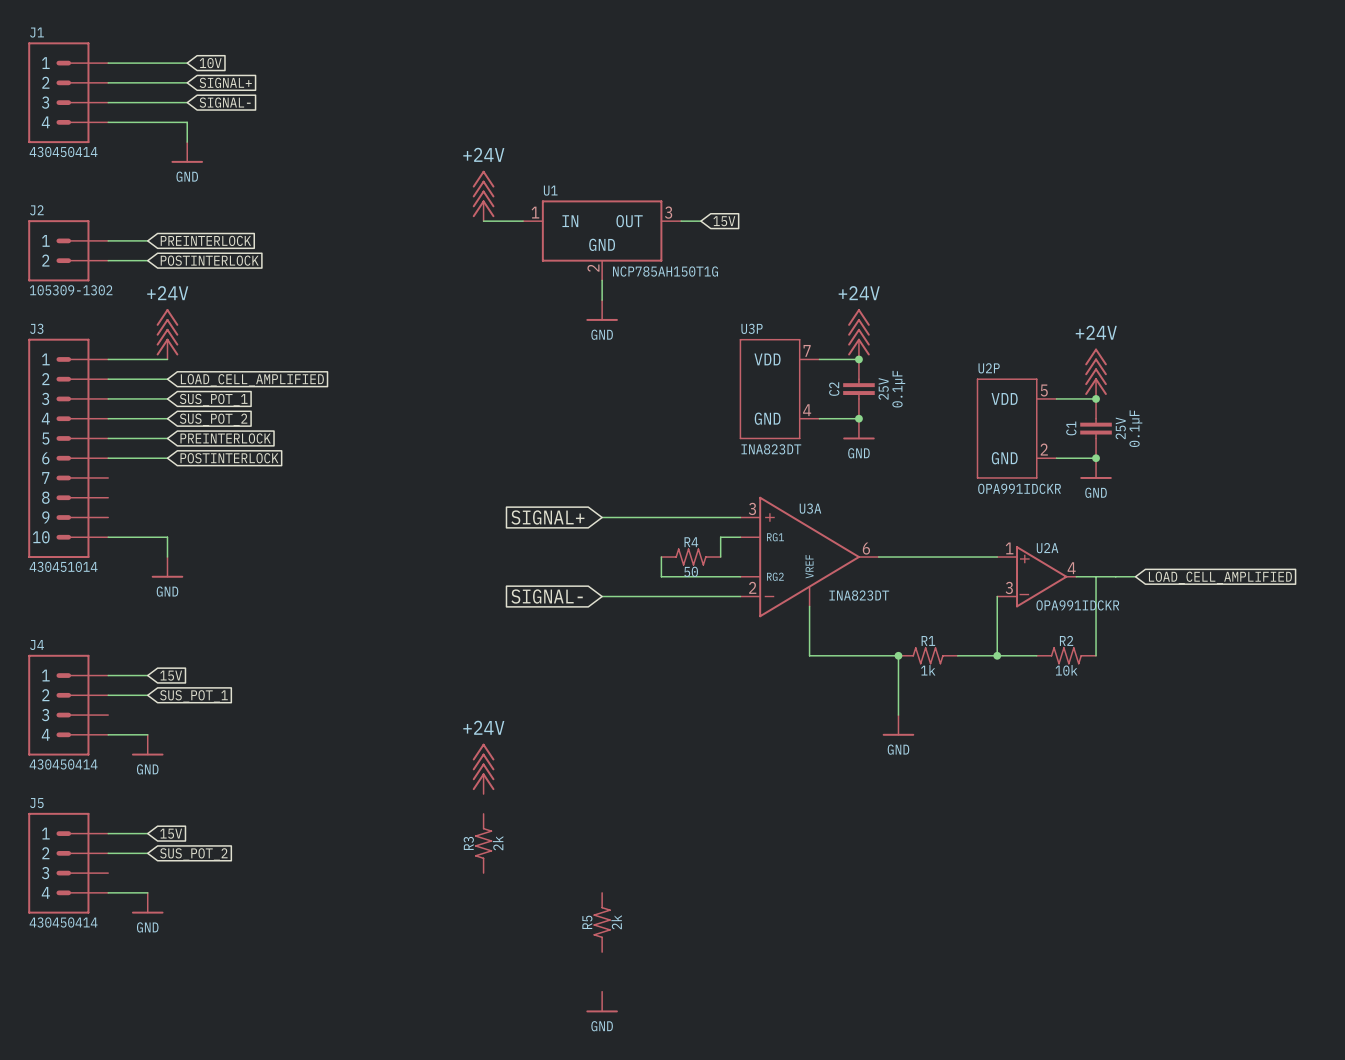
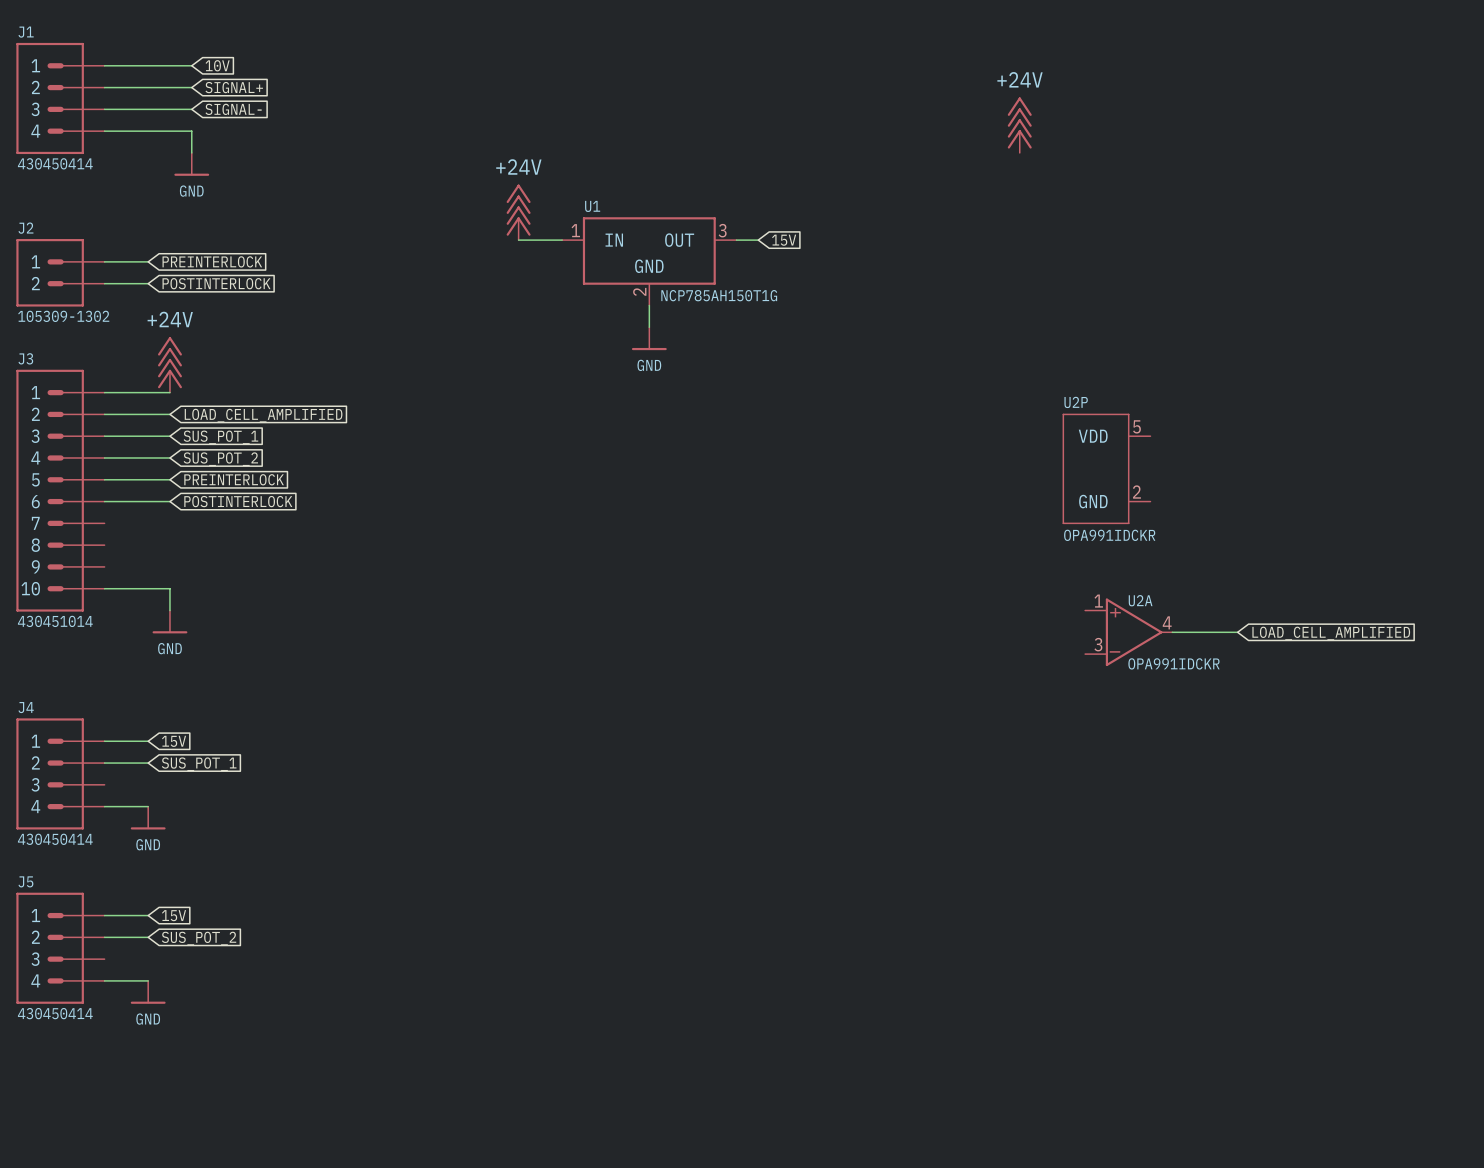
power symbol: none -> +24V (1019, 125)
power symbol: +24V (858, 334) -> none
wire: (819, 359) (858, 359) -> none
junction: (858, 359) -> none
power symbol: +24V (1096, 373) -> none
U3P: (779, 389) -> none
C2: (858, 389) -> none
wire: (1056, 398) (1096, 398) -> none
junction: (1096, 398) -> none
wire: (819, 418) (858, 418) -> none
junction: (858, 418) -> none
C1: (1096, 428) -> none
power symbol: GND (858, 429) -> none
wire: (1056, 458) (1096, 458) -> none
junction: (1096, 458) -> none
power symbol: GND (1096, 468) -> none
global label: SIGNAL+ (547, 517) -> none
wire: (602, 517) (740, 517) -> none
wire: (740, 537) (720, 537) (720, 557) -> none
wire: (661, 557) (661, 576) (740, 576) -> none
R4: (691, 557) -> none
U3A: (809, 557) -> none
wire: (878, 557) (997, 557) -> none
wire: (1096, 576) (1096, 655) -> none
global label: SIGNAL- (547, 596) -> none
wire: (602, 596) (740, 596) -> none
wire: (997, 596) (997, 655) -> none
wire: (809, 606) (809, 655) (898, 655) (898, 715) -> none
junction: (898, 655) -> none
R1: (928, 655) -> none
wire: (957, 655) (1036, 655) -> none
junction: (997, 655) -> none
R2: (1066, 655) -> none
power symbol: GND (898, 725) -> none
power symbol: +24V (483, 768) -> none
R3: (483, 843) -> none
R5: (602, 922) -> none
power symbol: GND (602, 1002) -> none

